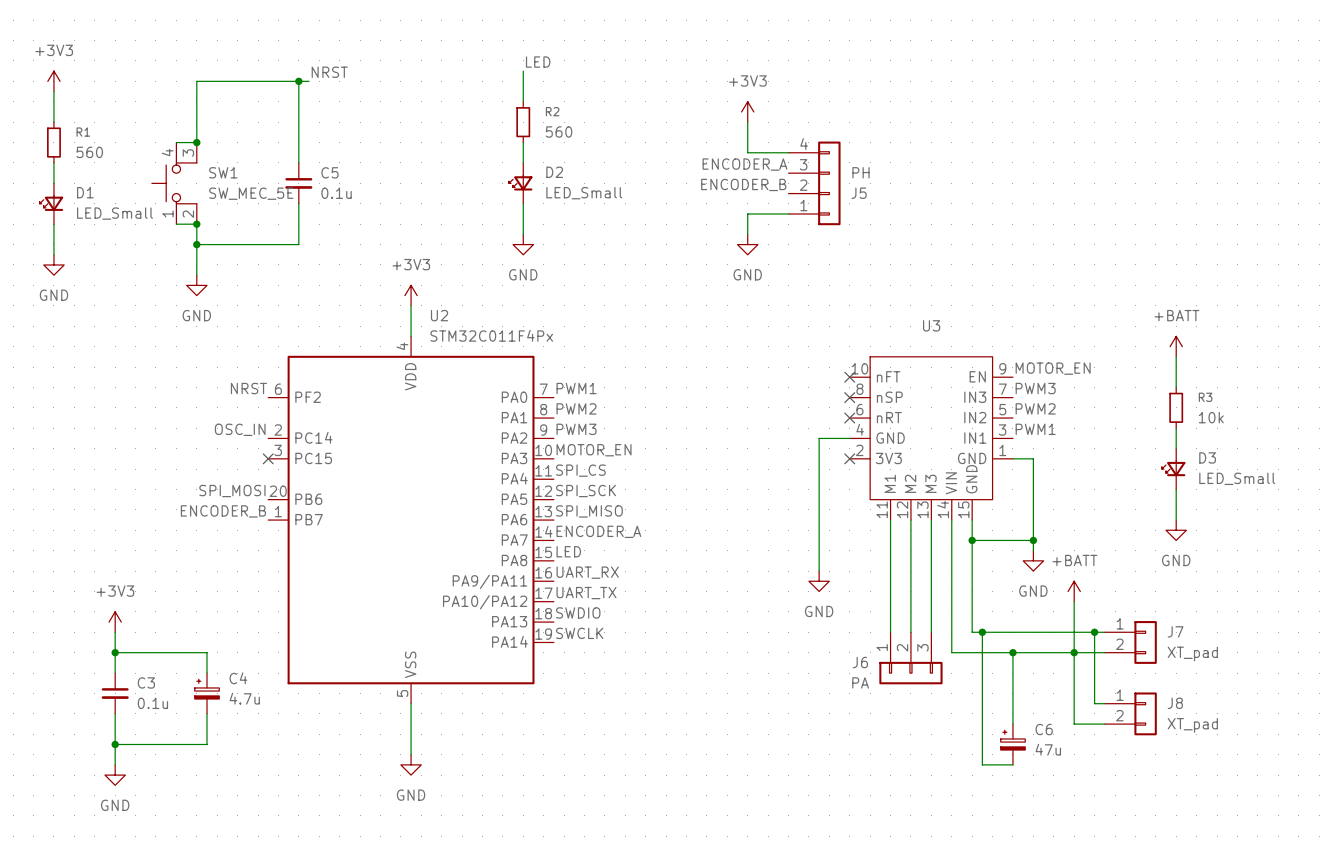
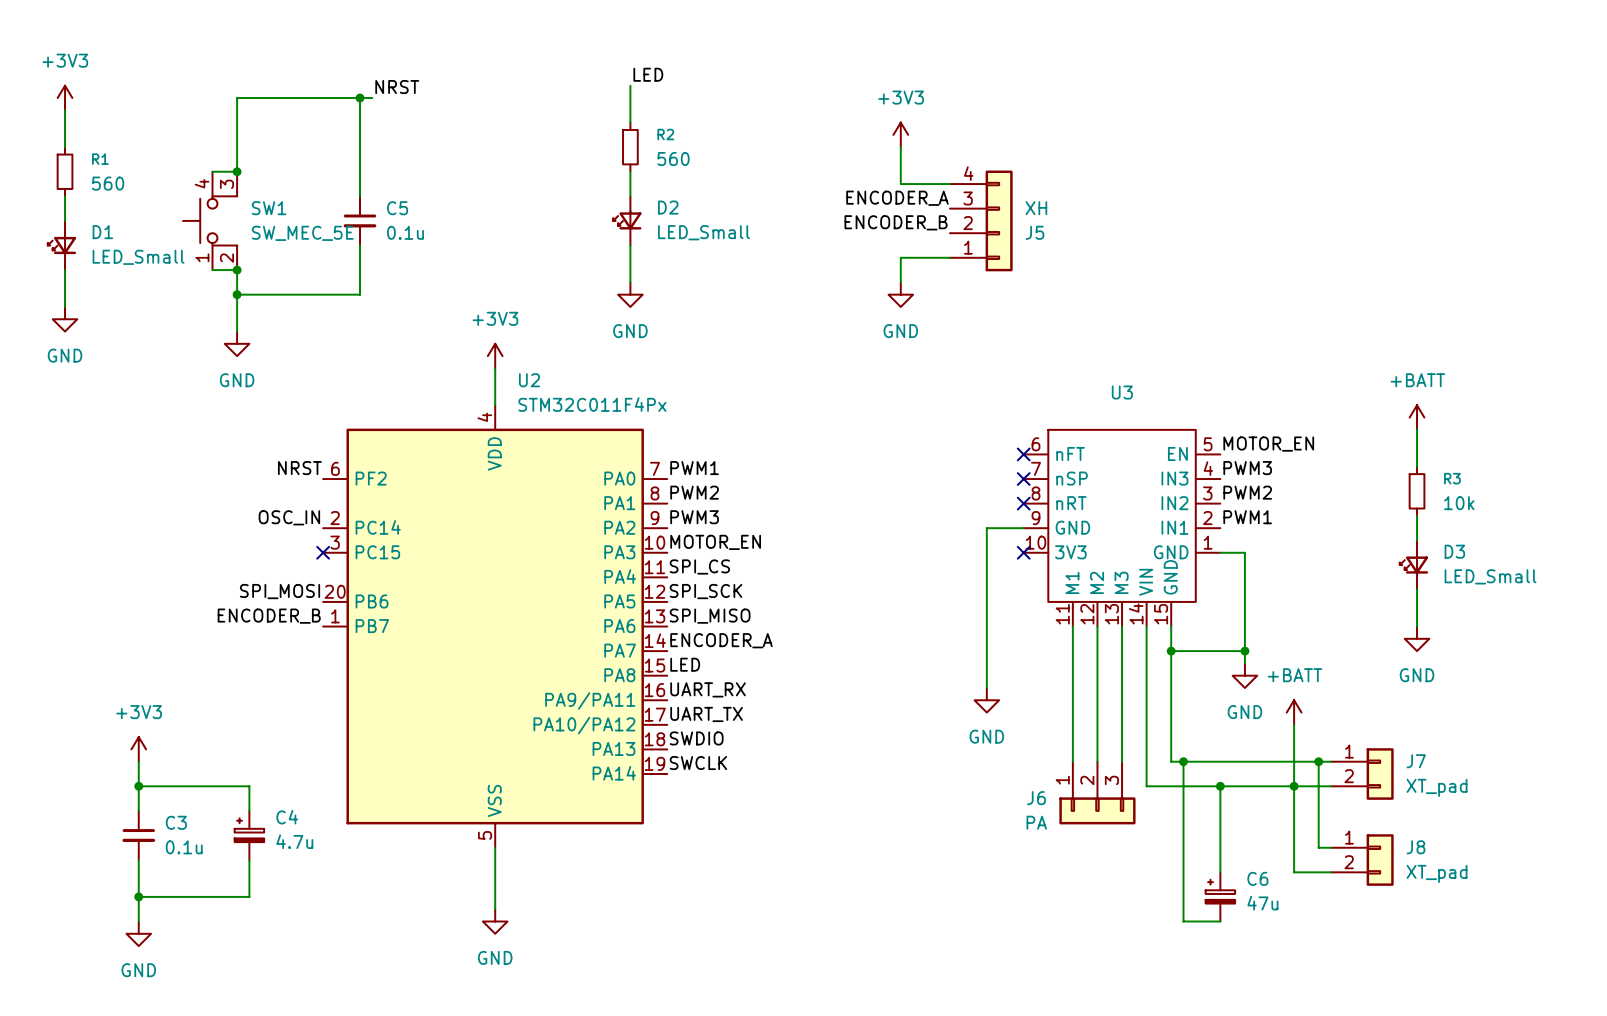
J5 value: PH (860, 172) -> XH (1036, 208)
U3 symbol: [849, 356, 1013, 521] -> [1023, 429, 1221, 627]

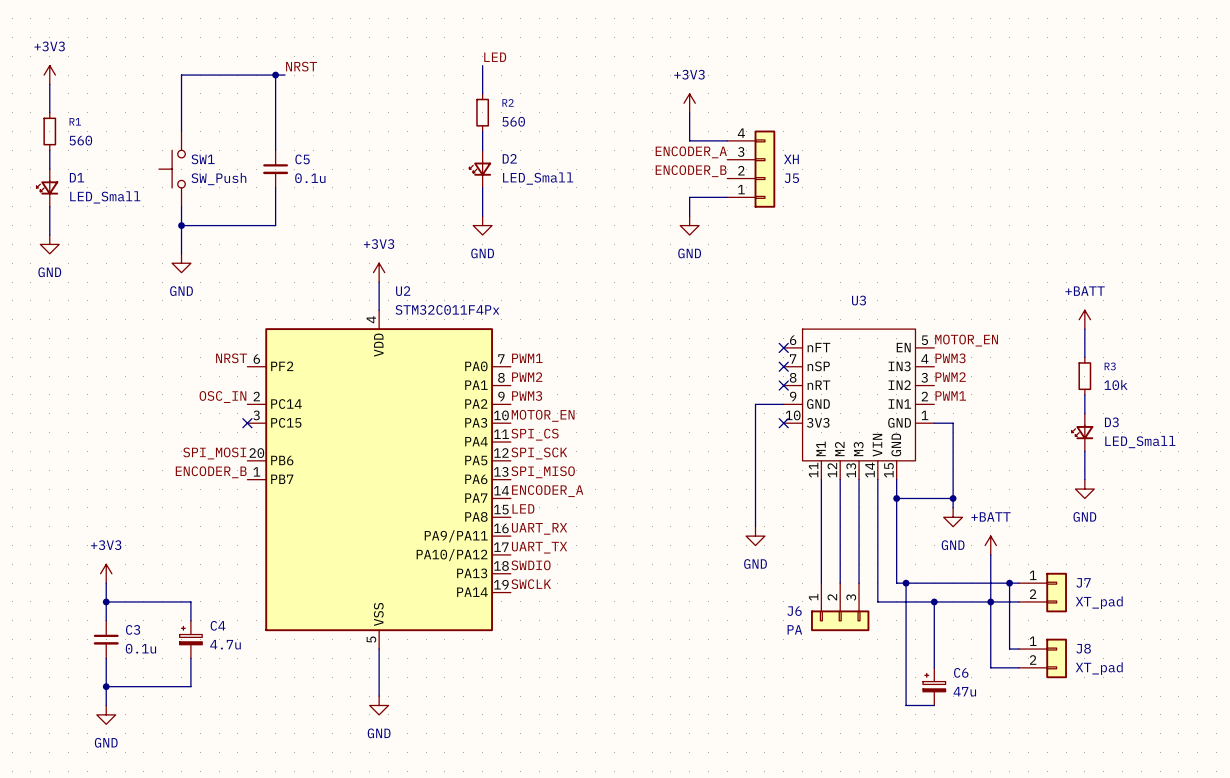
SW1 symbol: [183, 171, 238, 271] -> [158, 131, 186, 207]
wire: (212, 171) (237, 171) -> none
junction: (237, 171) -> none
SW1 value: SW_MEC_5E (302, 233) -> SW_Push (218, 179)
wire: (212, 270) (237, 270) -> none
junction: (237, 270) -> none

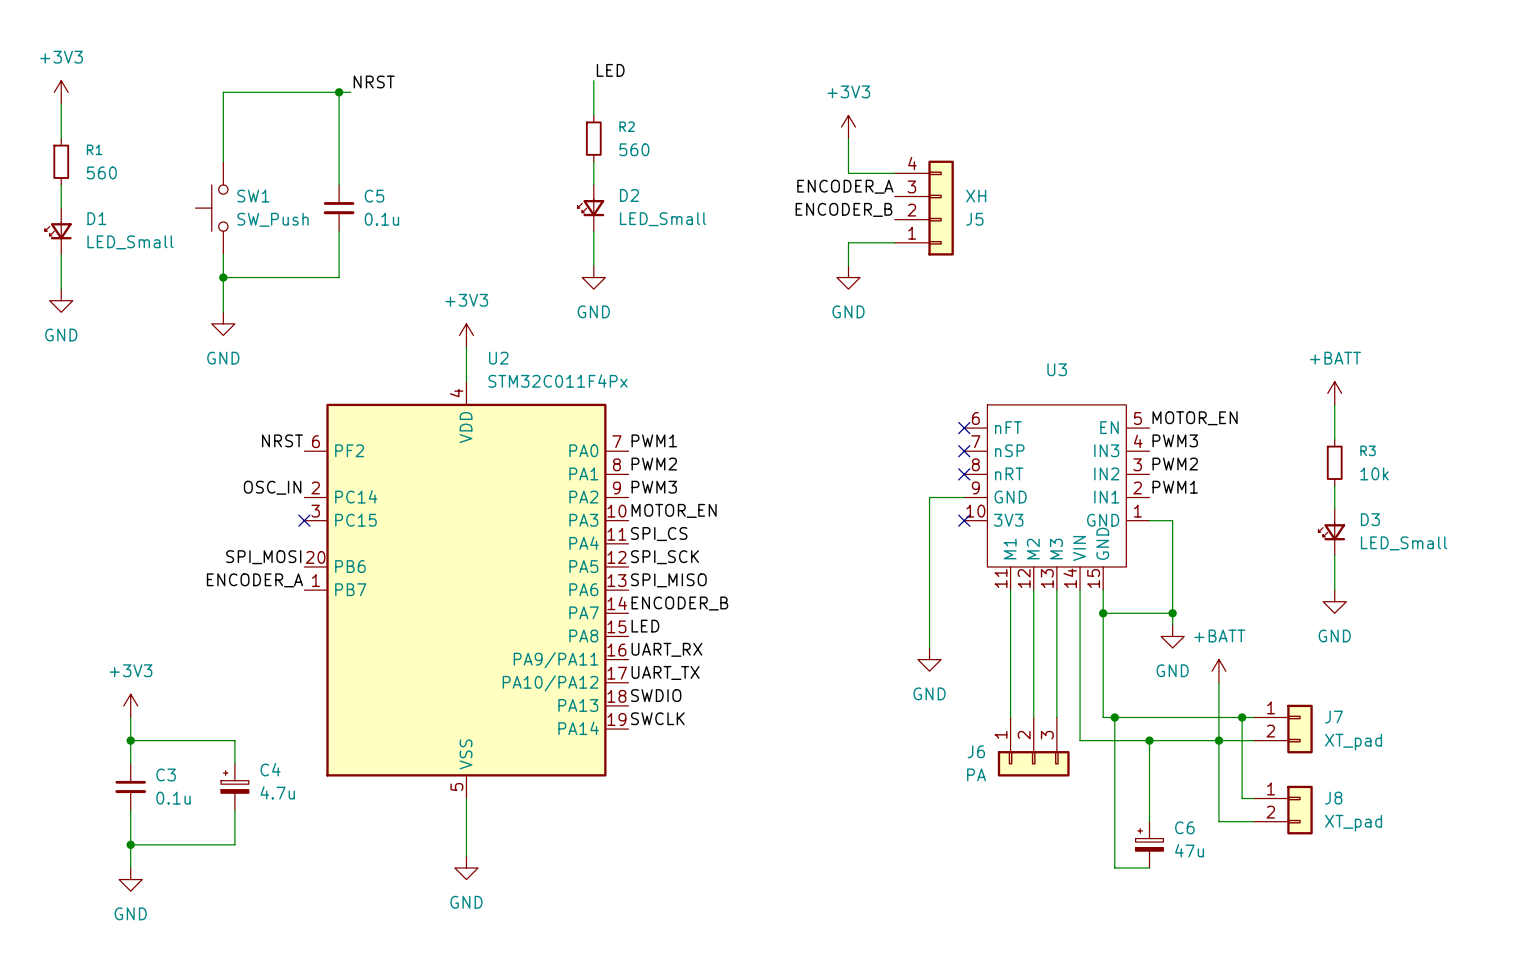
label: ENCODER_B (211, 472) -> ENCODER_A (254, 580)
label: ENCODER_A (547, 491) -> ENCODER_B (679, 603)

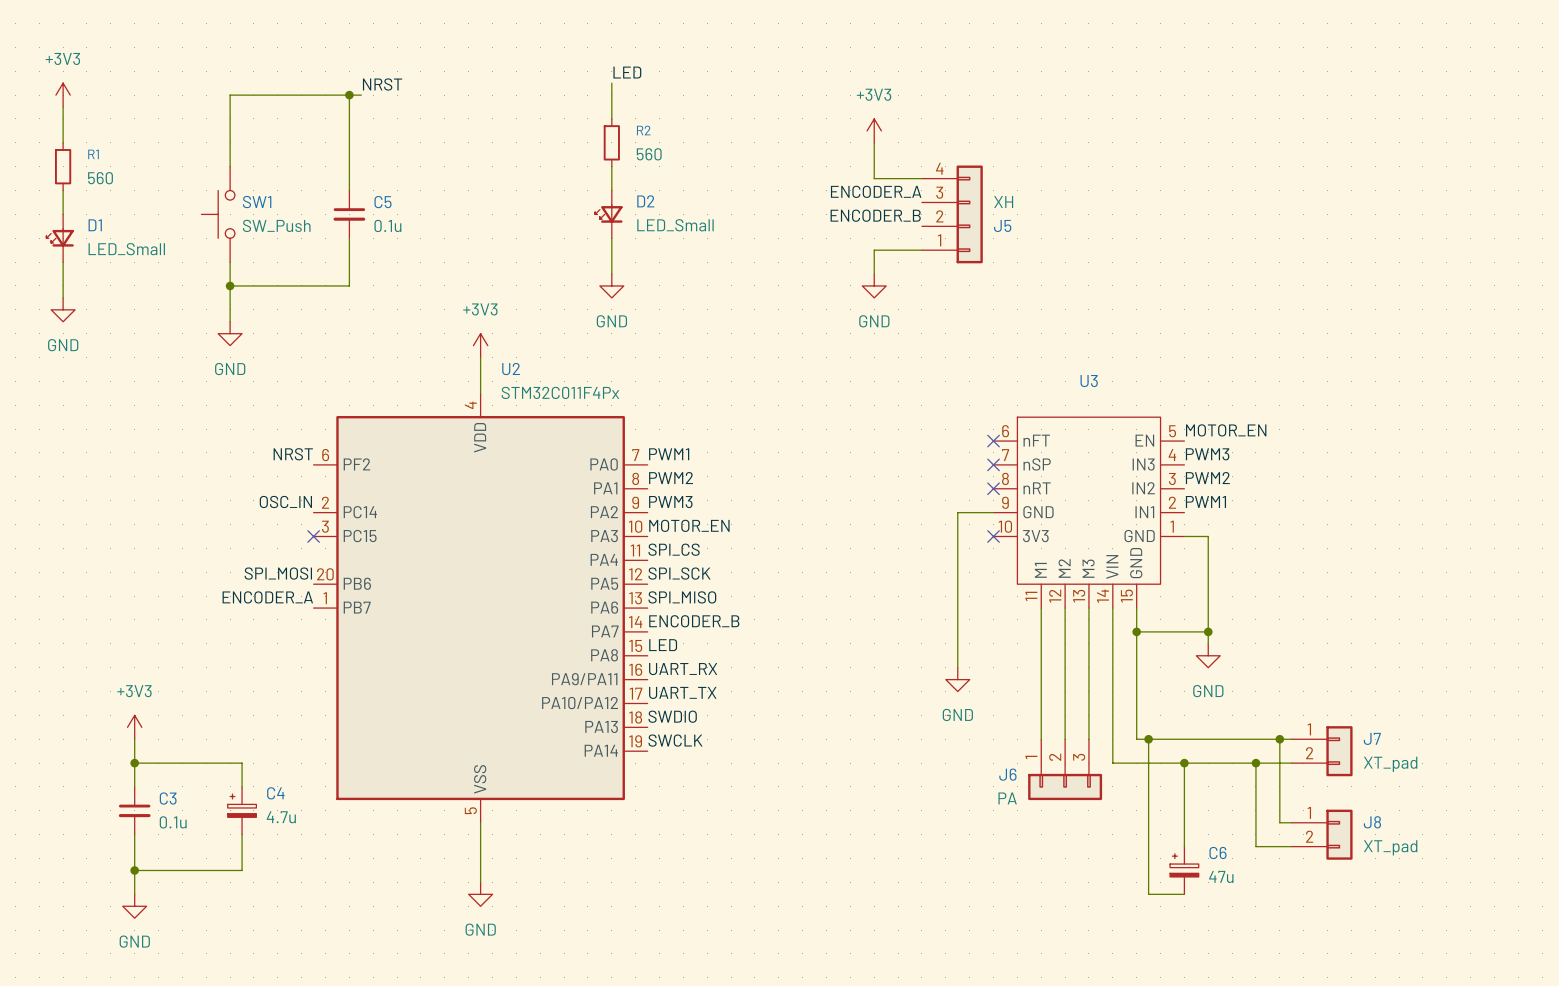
power symbol: +BATT (1334, 393) -> none
wire: (1334, 404) (1334, 439) -> none
R3: 10k (1334, 462) -> none
wire: (1334, 485) (1334, 509) -> none
D3: LED_Small (1331, 532) -> none
wire: (1334, 555) (1334, 590) -> none
power symbol: GND (1334, 601) -> none
power symbol: +BATT (1218, 671) -> none
wire: (1218, 682) (1218, 740) -> none

